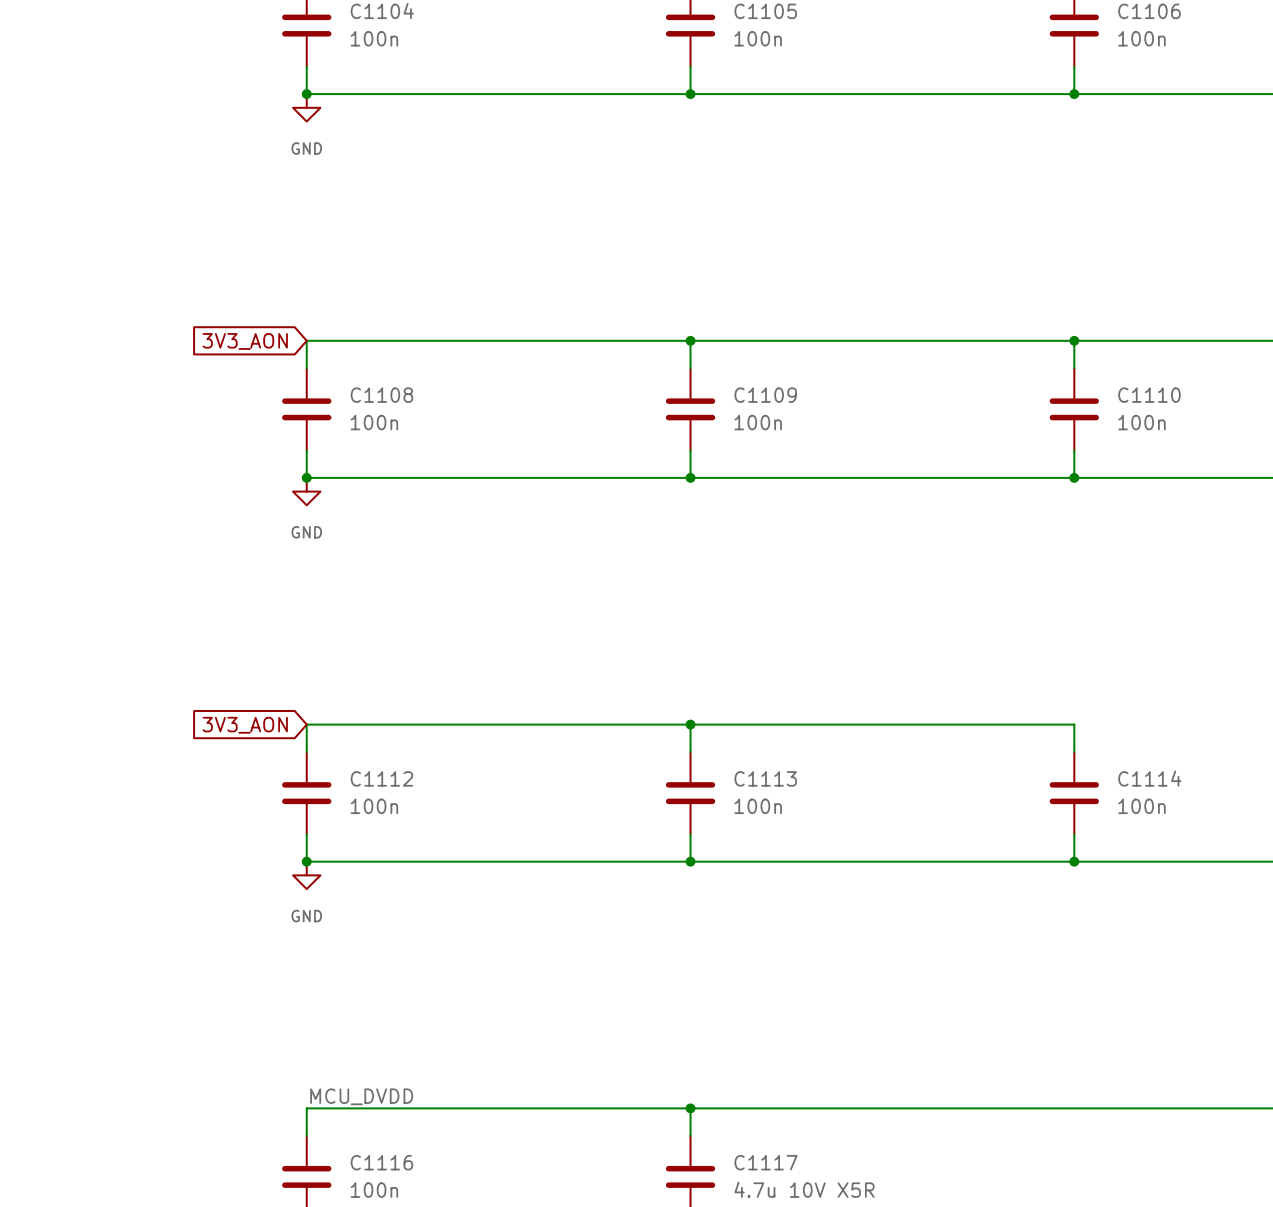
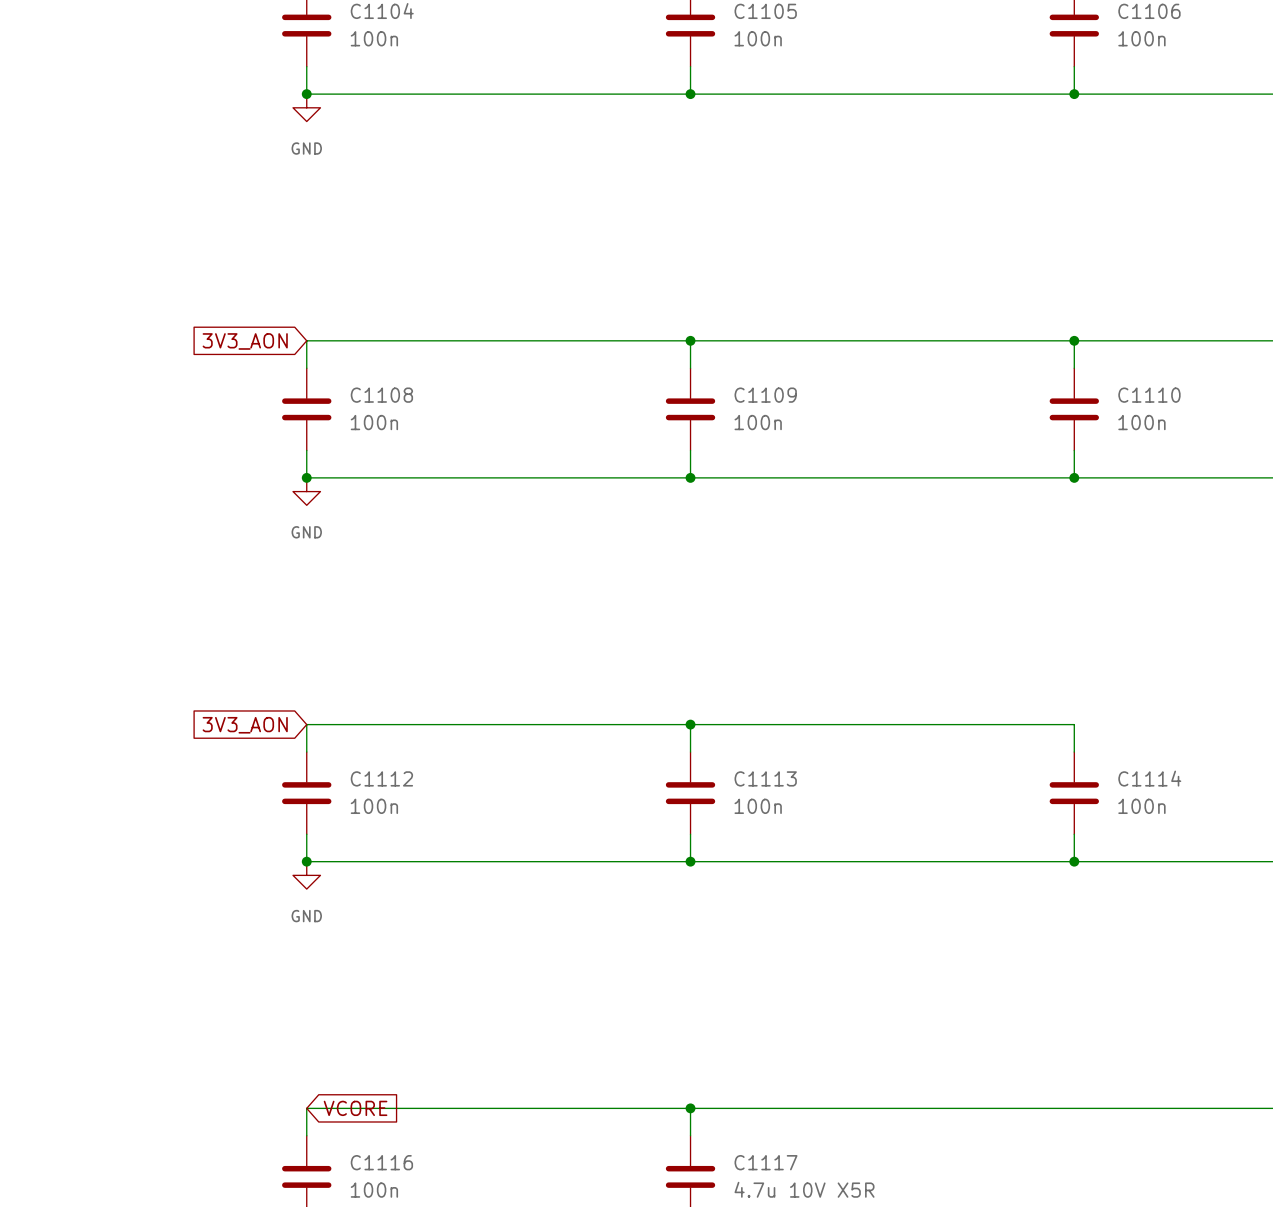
label: MCU_DVDD (361, 1096) -> none
global label: none -> VCORE (355, 1108)

